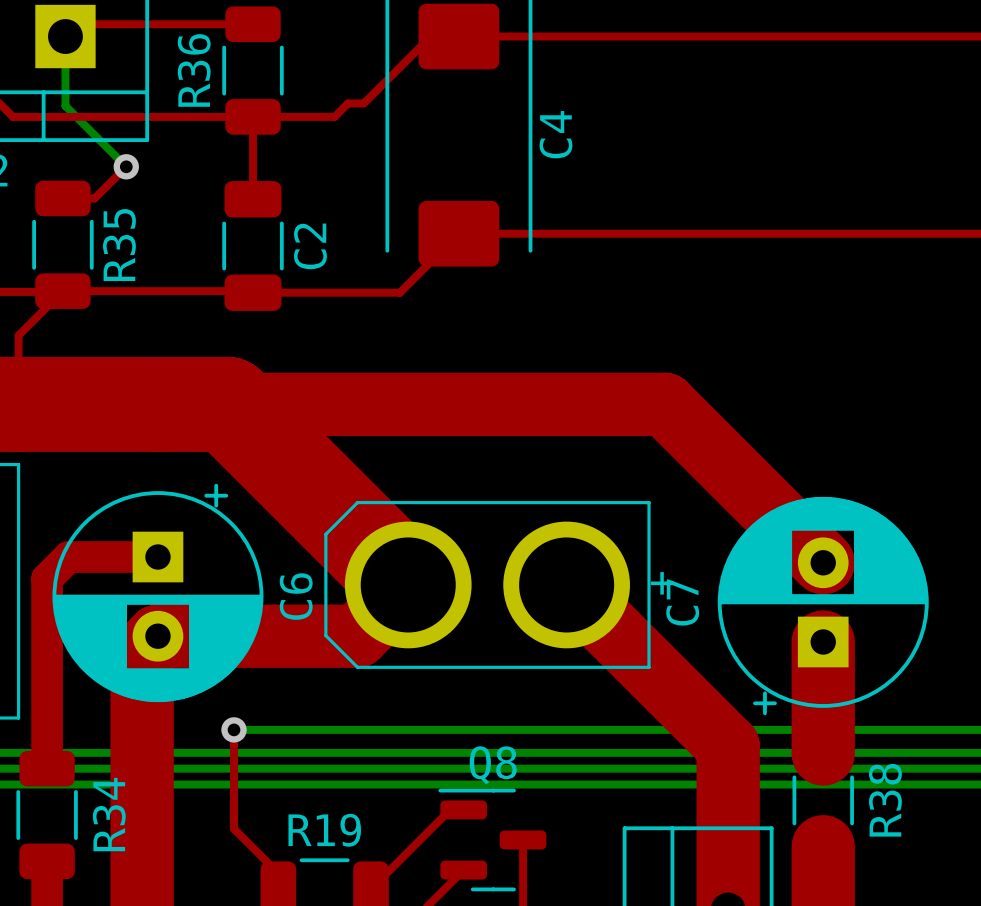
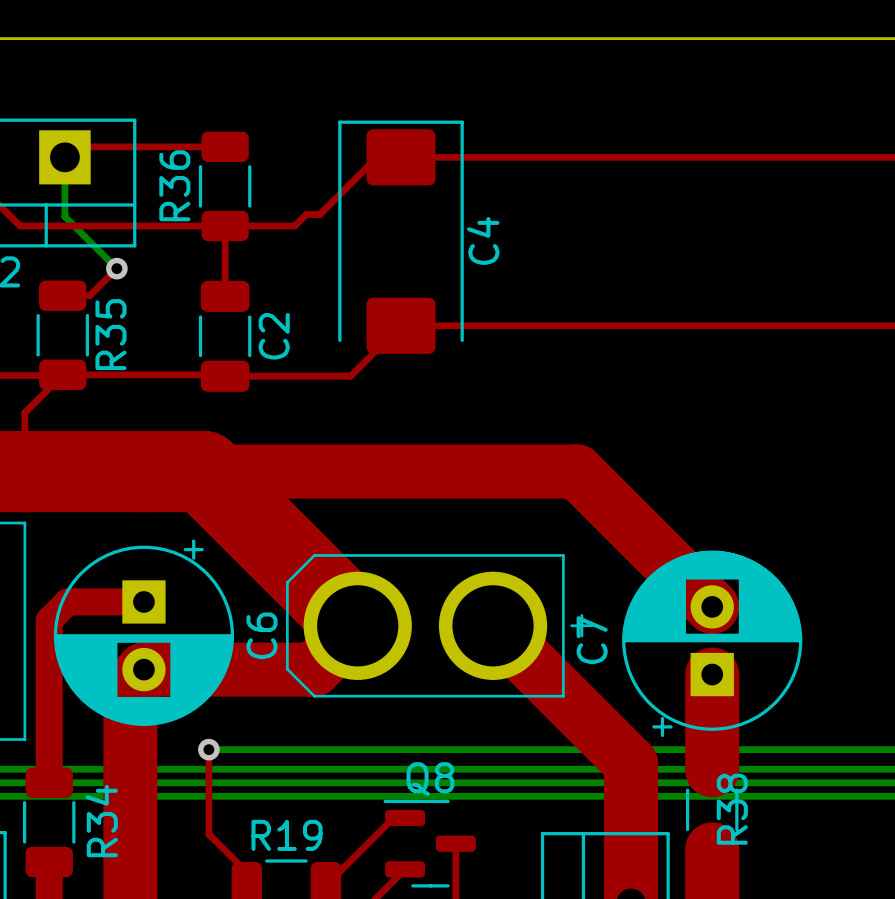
R38 name position: R38 (885, 800) -> R38 (732, 809)

